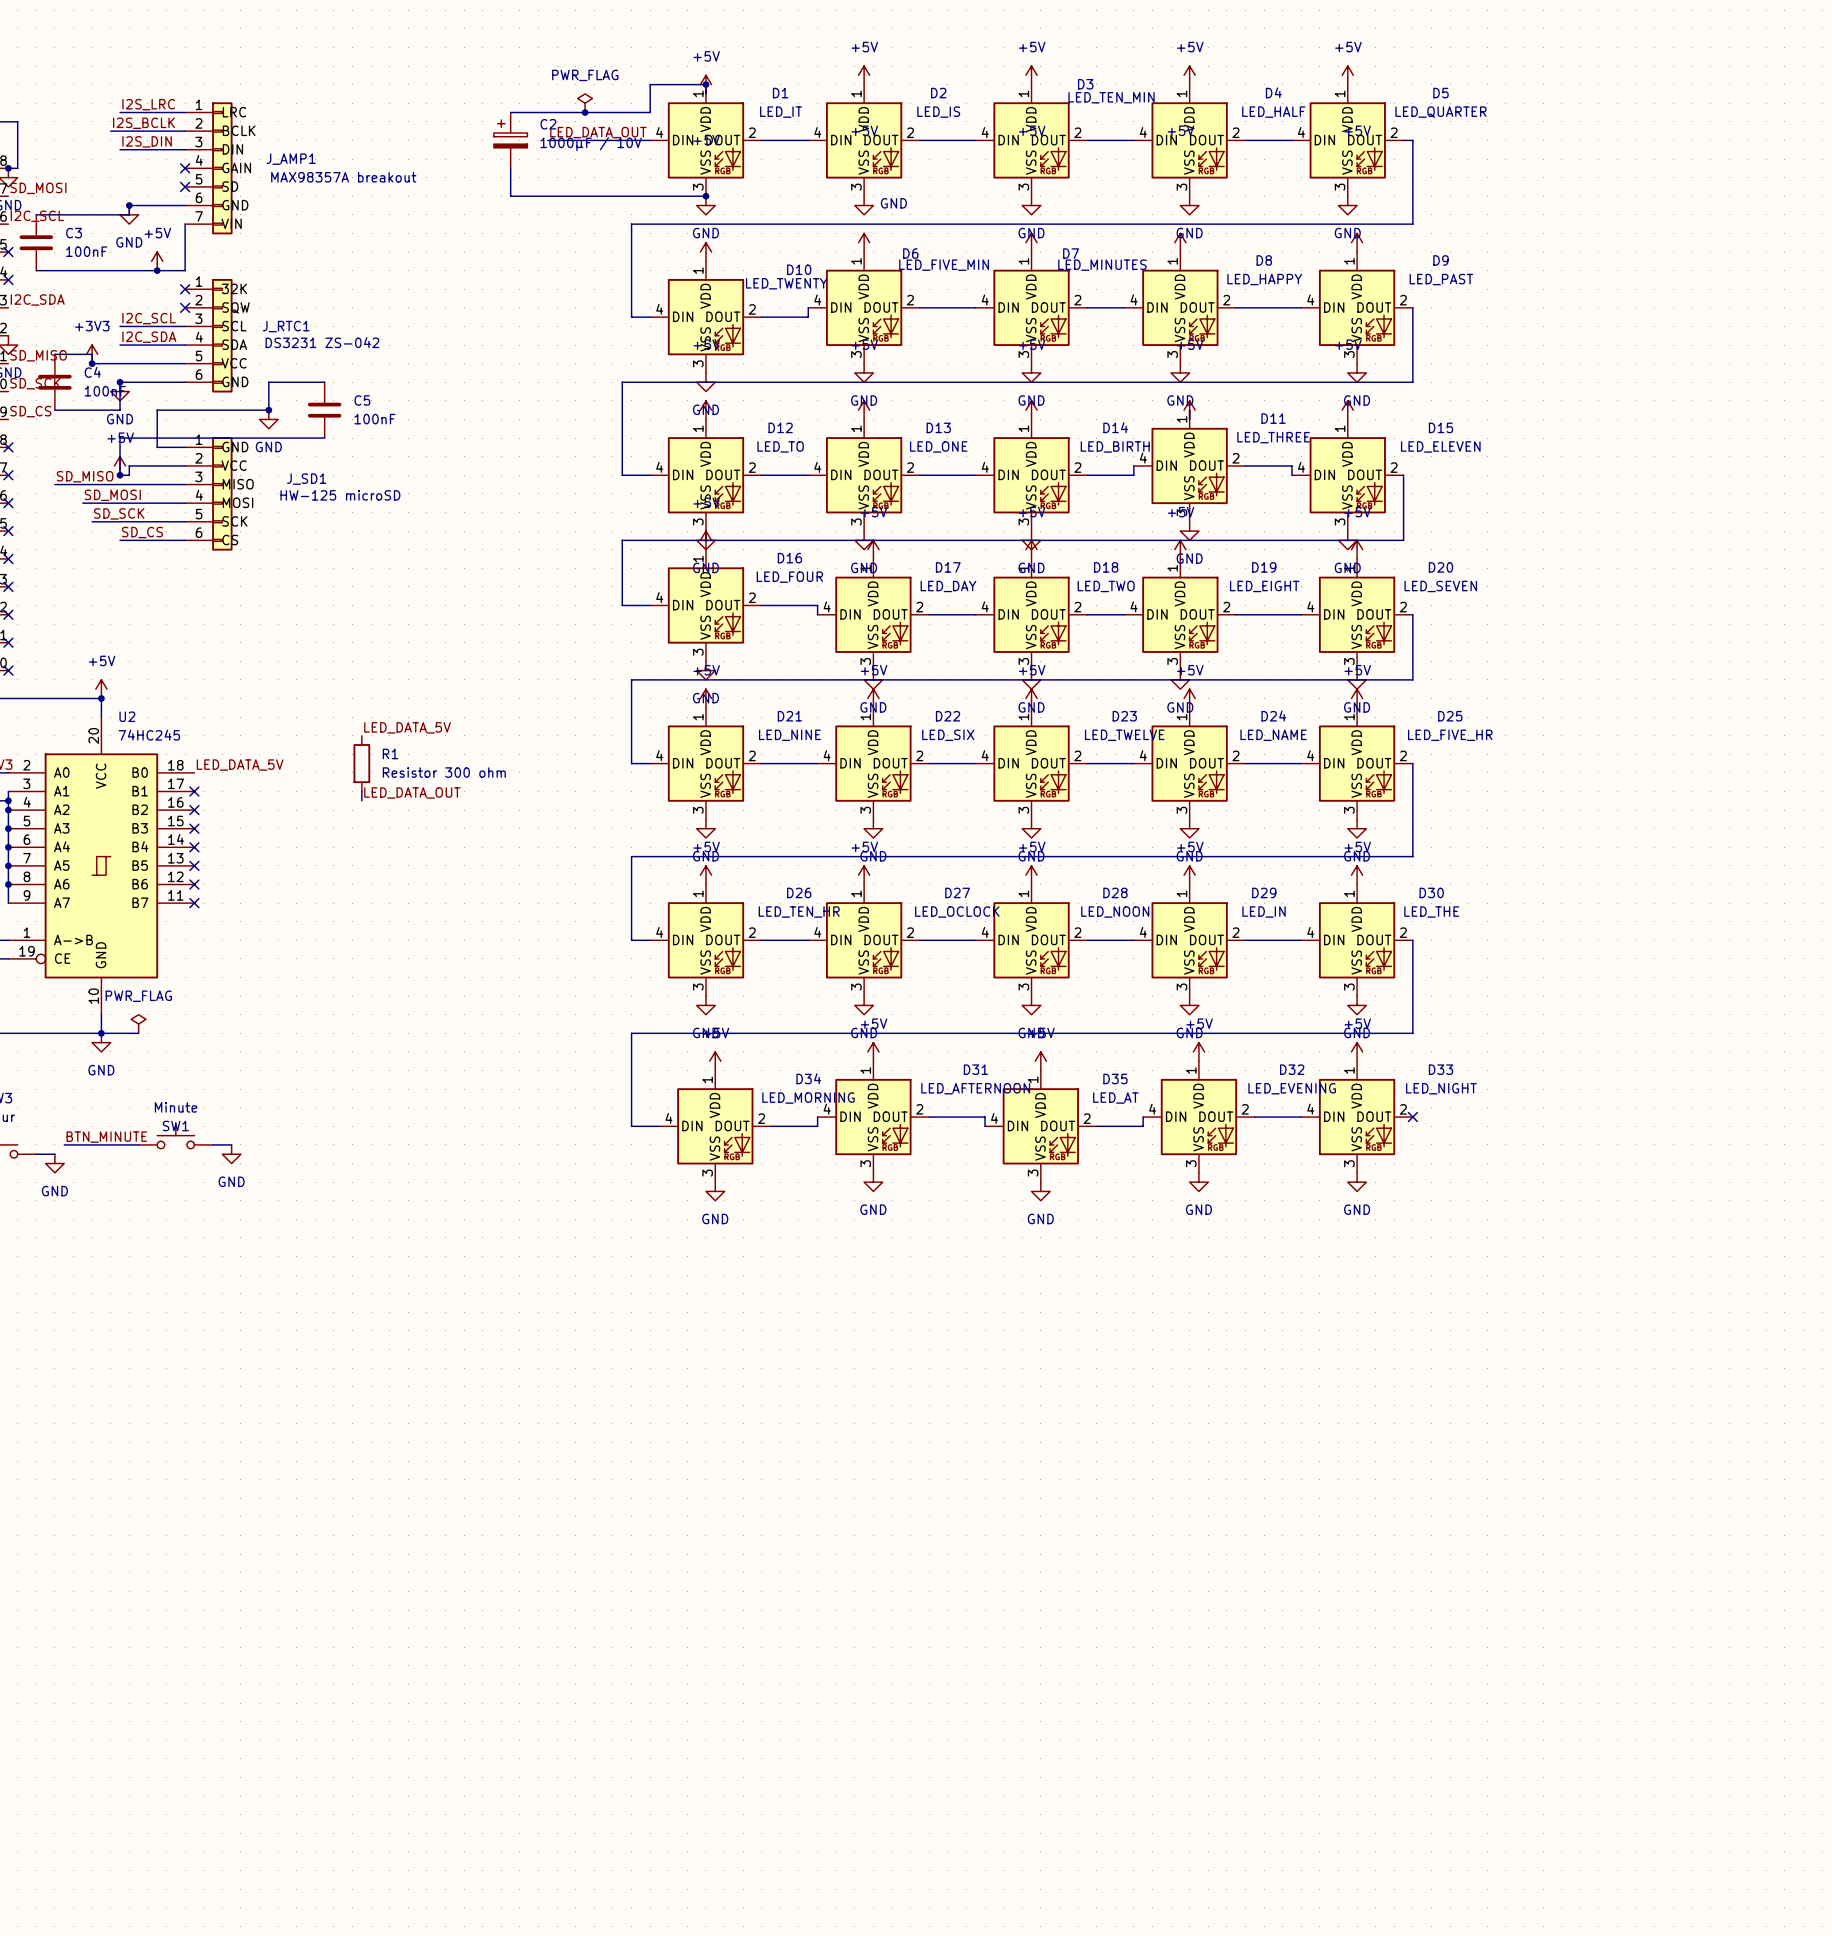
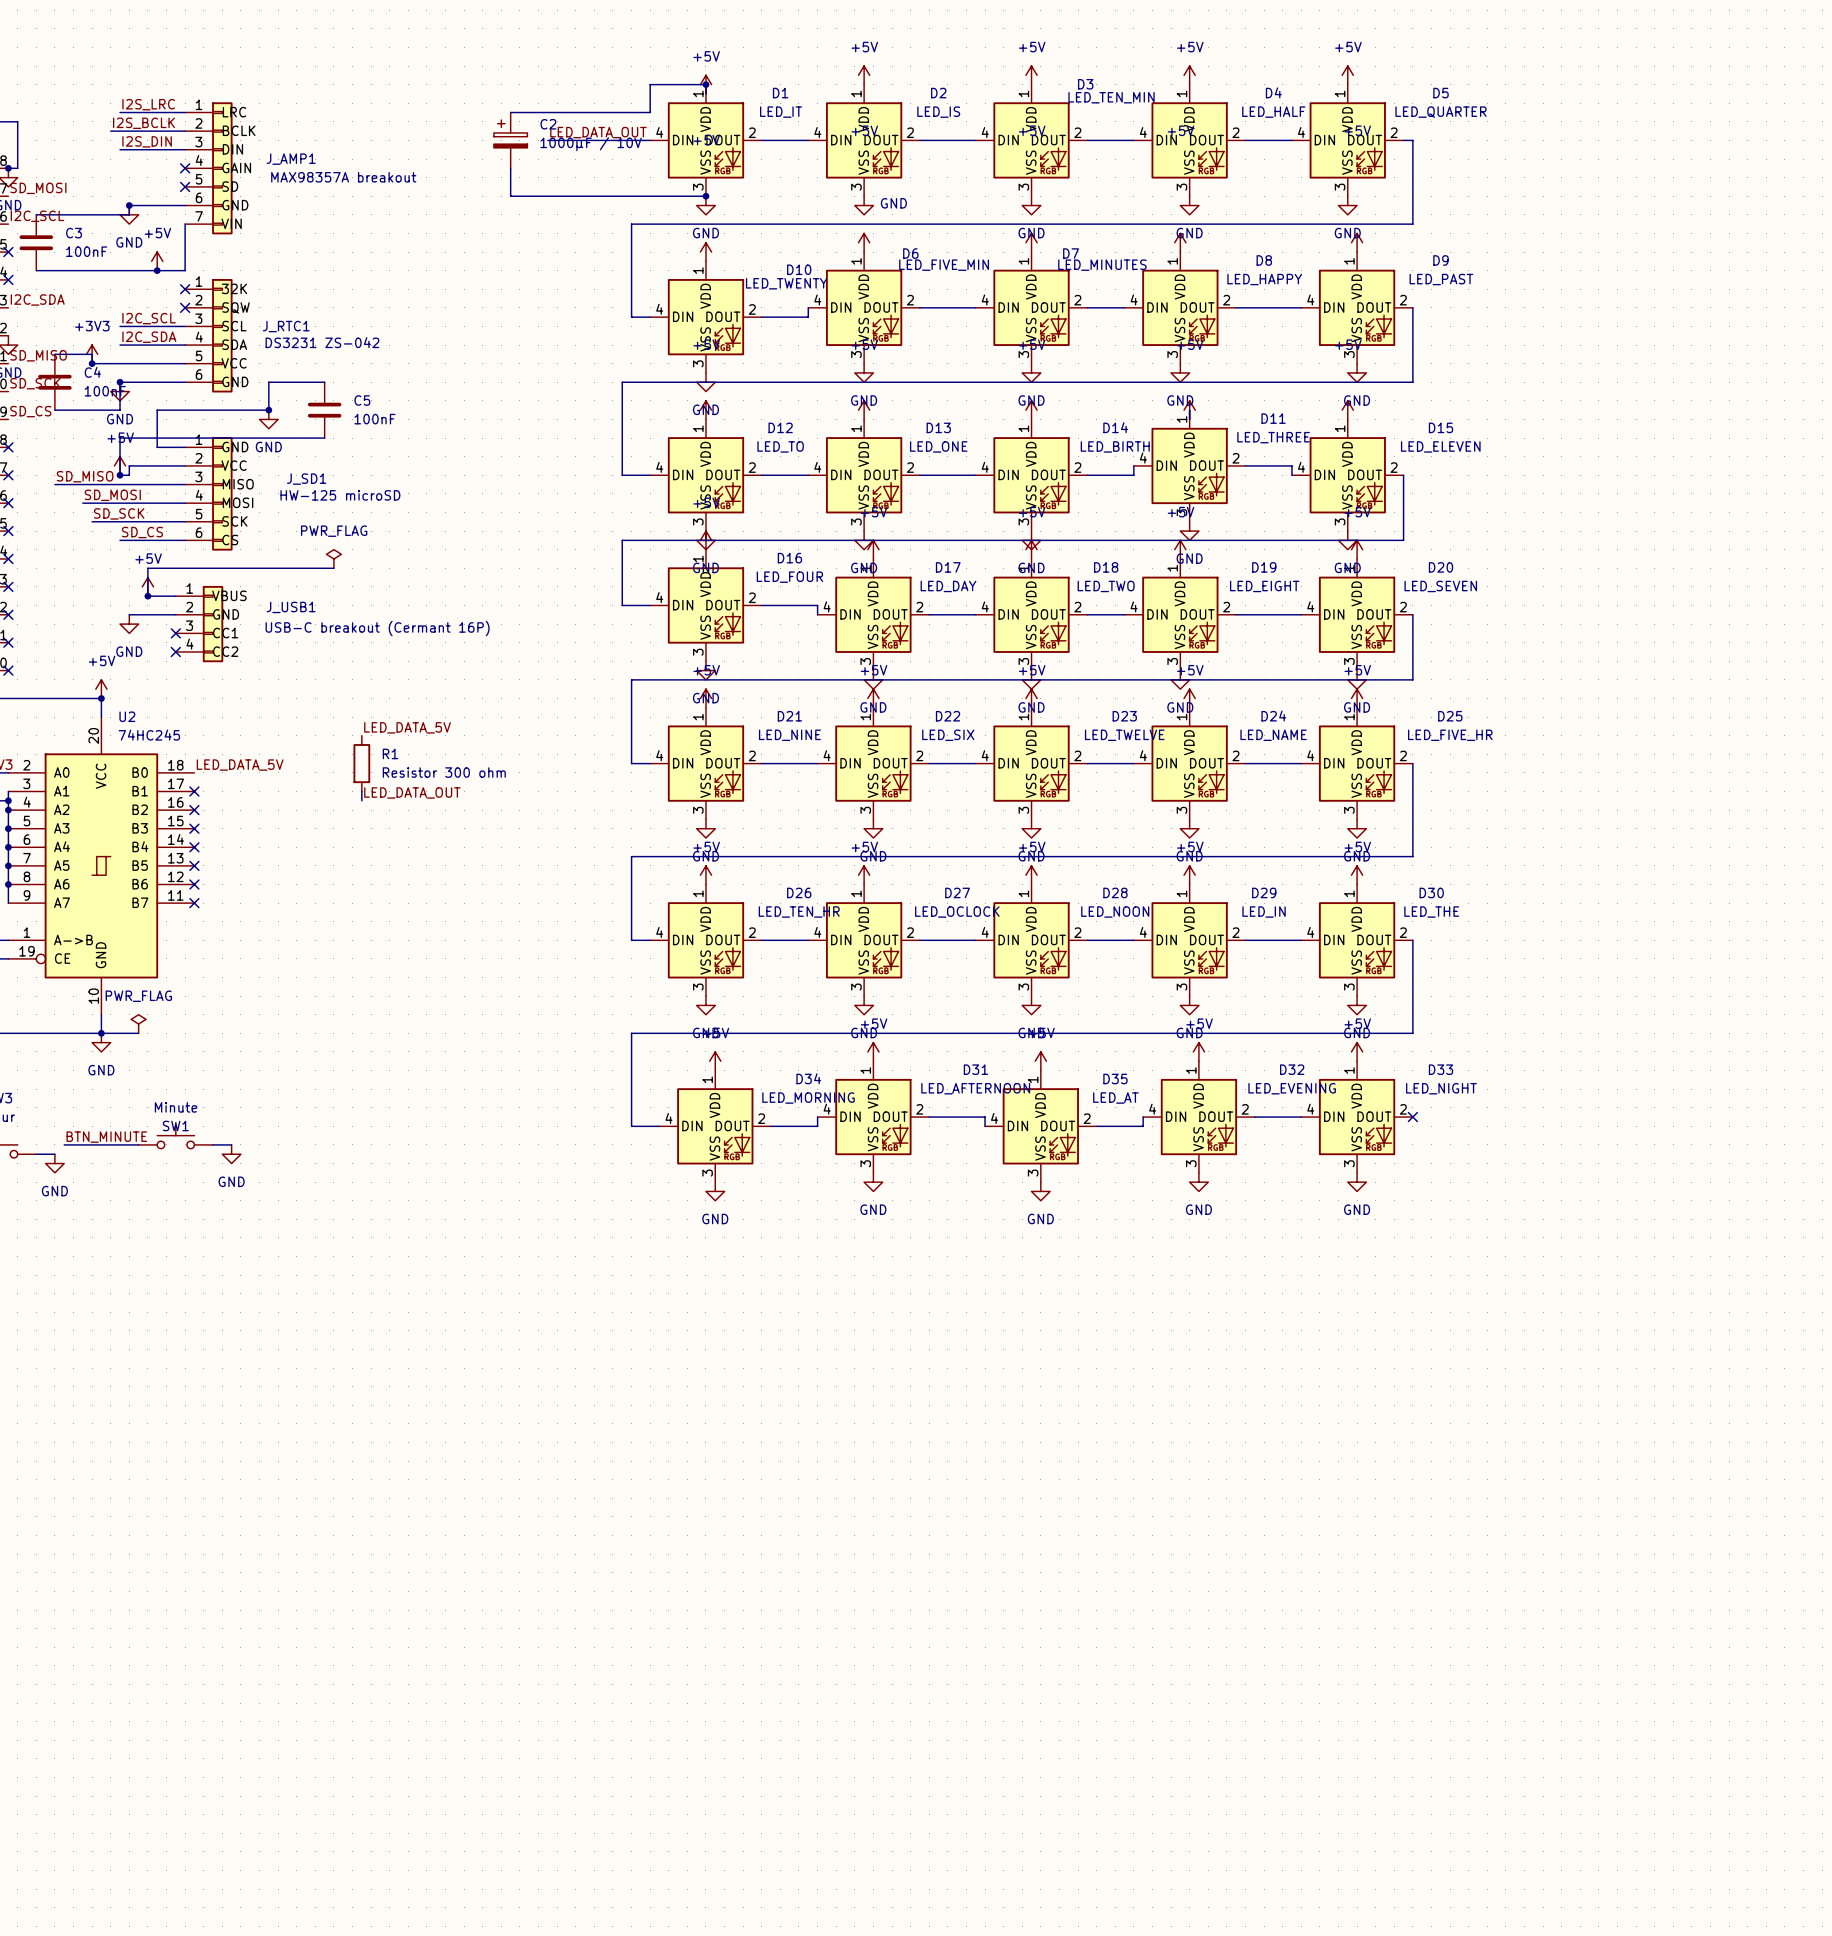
power symbol: PWR_FLAG (585, 103) -> none
junction: (585, 112) -> none
power symbol: none -> PWR_FLAG (333, 558)
wire: none -> (333, 568) (147, 568) (147, 596) (175, 596)
power symbol: none -> +5V (147, 586)
junction: none -> (147, 596)
wire: none -> (129, 614) (175, 614)
power symbol: none -> GND (129, 624)
J_USB1: none -> USB-C breakout (Cermant 16P) (199, 624)
no-connect mark: none -> (175, 633)
no-connect mark: none -> (175, 651)

